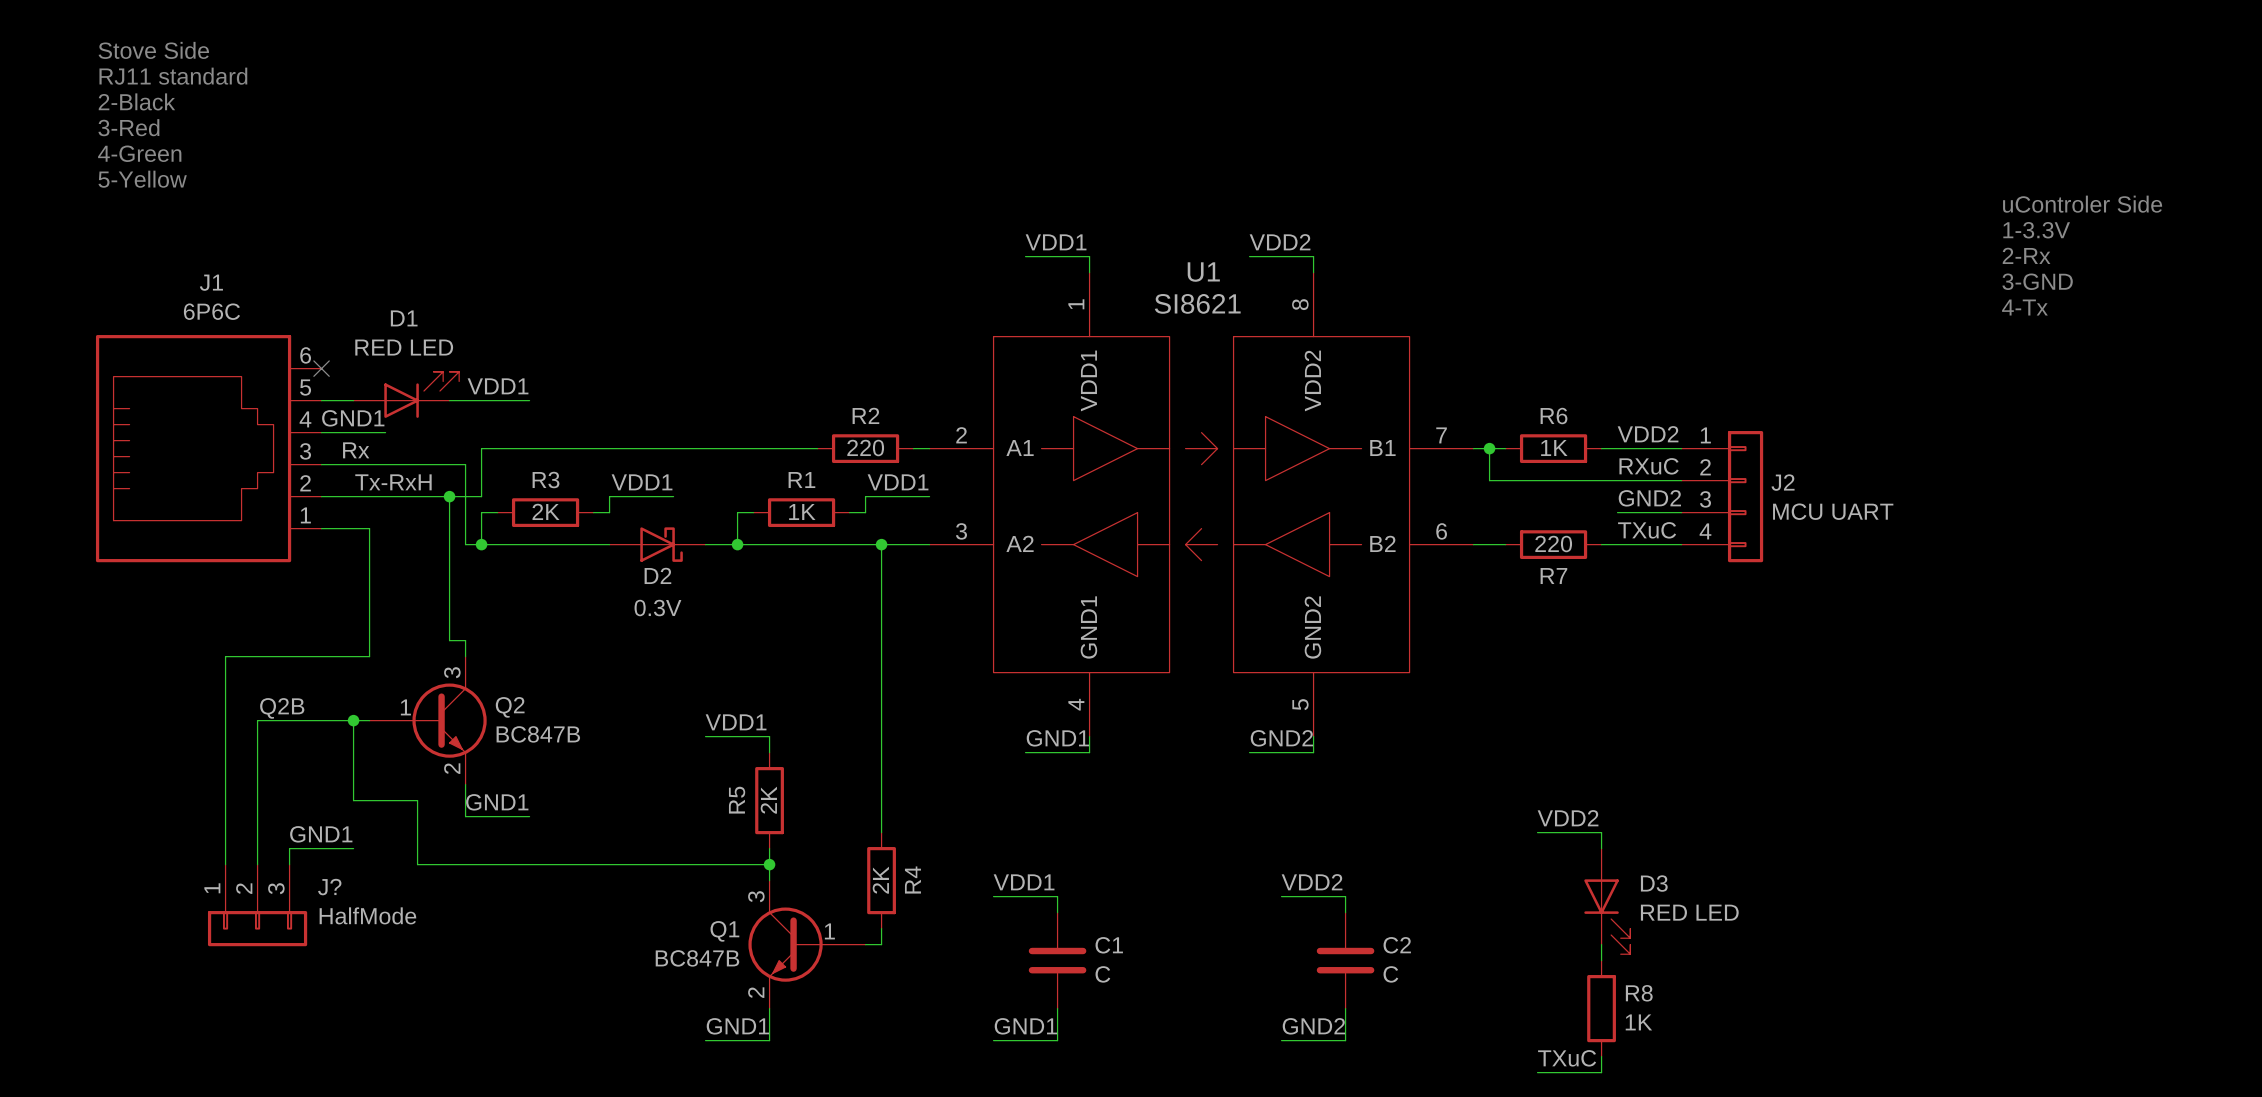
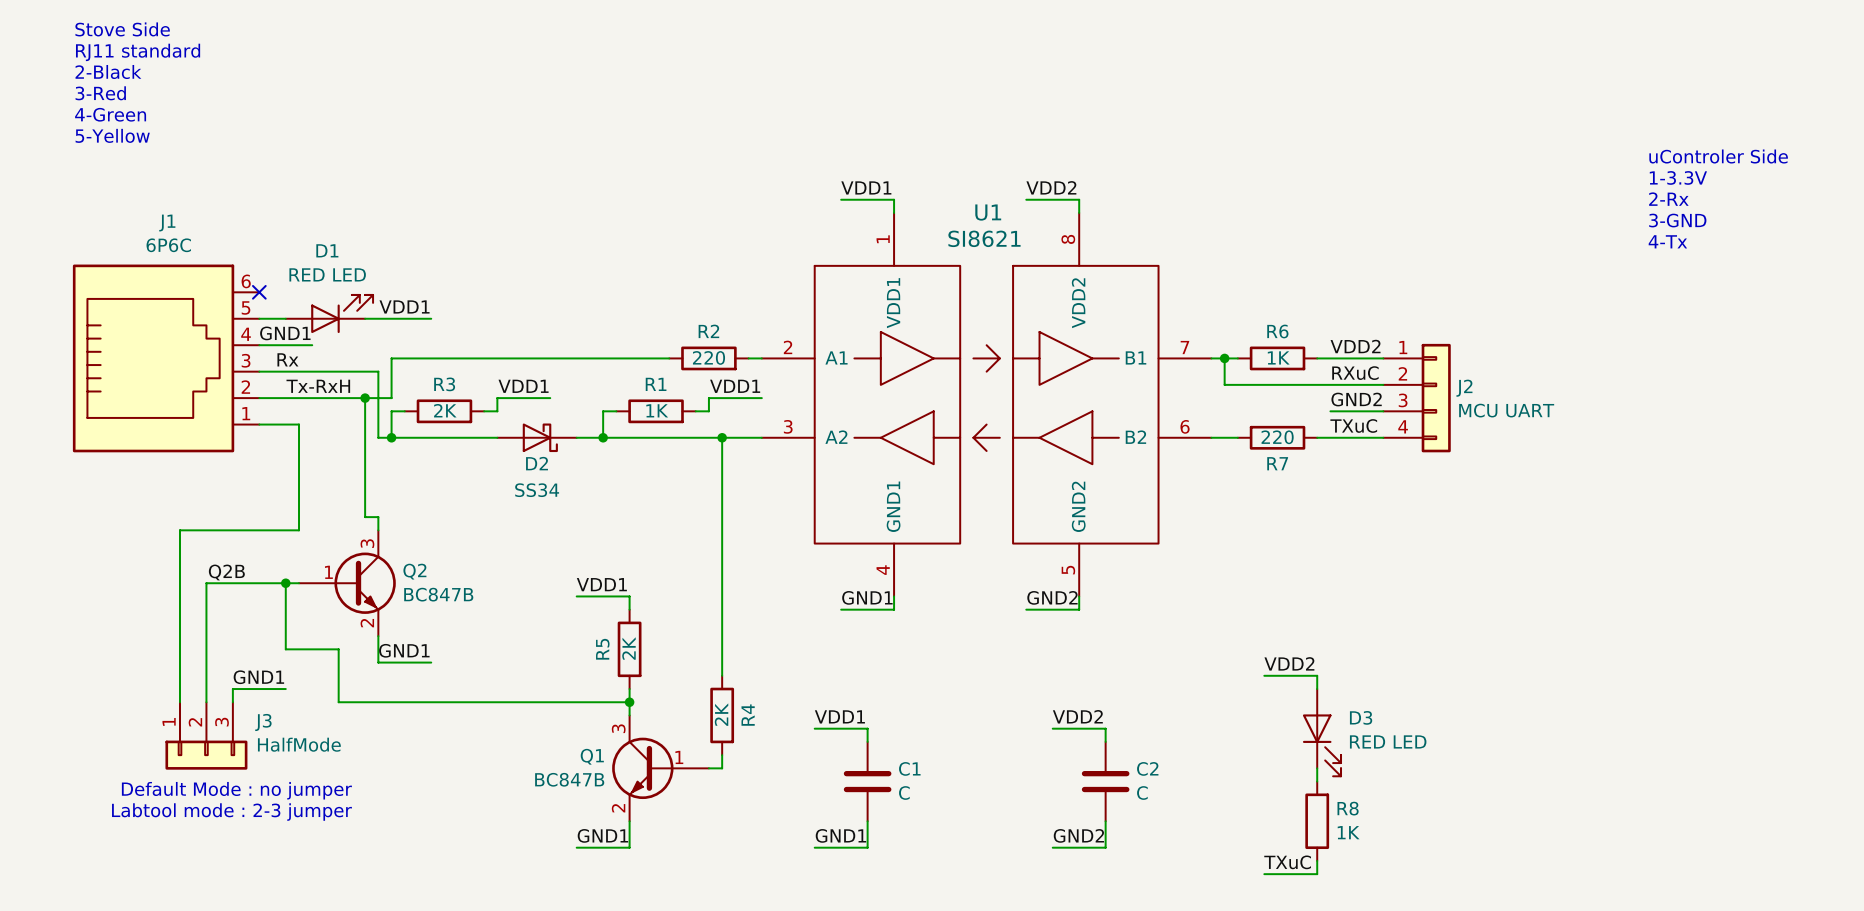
D2 value: 0.3V (657, 608) -> SS34 (537, 490)
J? name: J? (329, 887) -> J3 (263, 722)
text: none -> Default Mode : no jumper (236, 790)
text: none -> Labtool mode : 2-3 jumper (231, 812)

